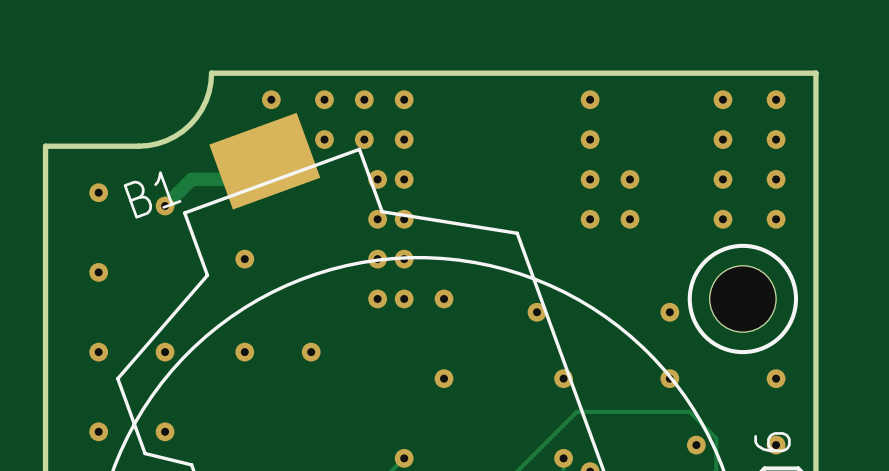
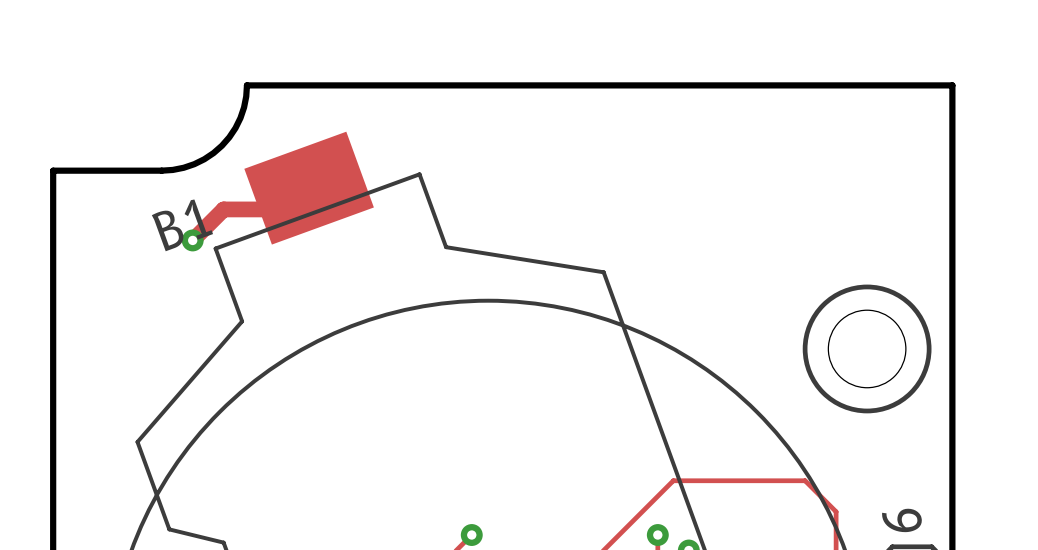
via: (271, 99) -> none
via: (324, 99) -> none
via: (364, 99) -> none
via: (404, 99) -> none
via: (590, 99) -> none
via: (722, 99) -> none
via: (776, 99) -> none
via: (324, 139) -> none
via: (364, 139) -> none
via: (404, 139) -> none
via: (590, 139) -> none
via: (722, 139) -> none
via: (776, 139) -> none
via: (377, 179) -> none
via: (404, 179) -> none
via: (590, 179) -> none
via: (629, 179) -> none
via: (722, 179) -> none
via: (776, 179) -> none
via: (98, 192) -> none
via: (377, 219) -> none
via: (404, 219) -> none
via: (590, 219) -> none
via: (629, 219) -> none
via: (722, 219) -> none
via: (776, 219) -> none
via: (244, 259) -> none
via: (377, 259) -> none
via: (404, 259) -> none
via: (98, 272) -> none
via: (377, 298) -> none
via: (404, 298) -> none
via: (444, 298) -> none
via: (537, 312) -> none
via: (669, 312) -> none
via: (98, 352) -> none
via: (165, 352) -> none
via: (244, 352) -> none
via: (311, 352) -> none
via: (444, 378) -> none
via: (563, 378) -> none
via: (669, 378) -> none
via: (776, 378) -> none
via: (98, 431) -> none
via: (165, 431) -> none
via: (696, 445) -> none
via: (776, 445) -> none

